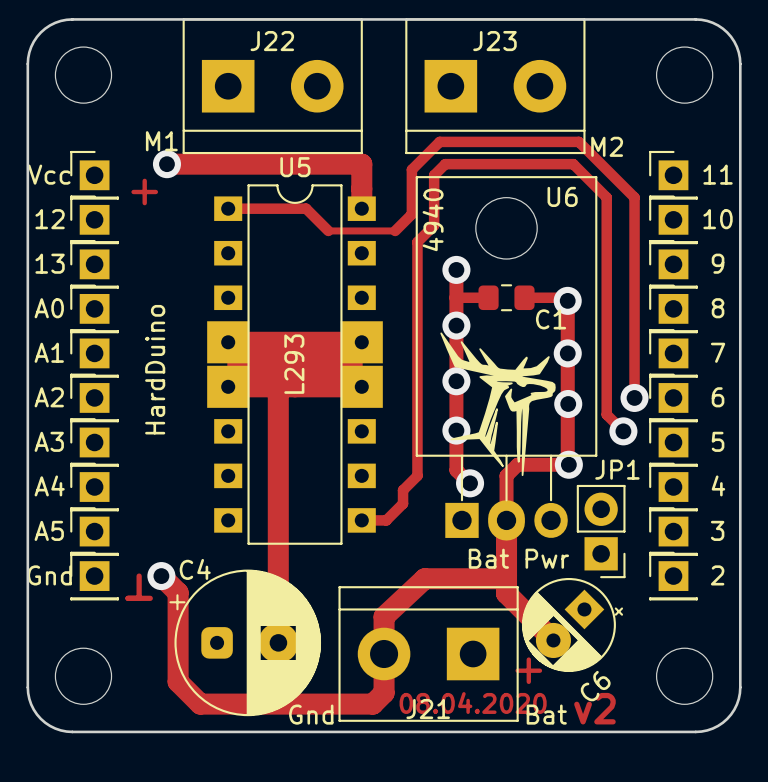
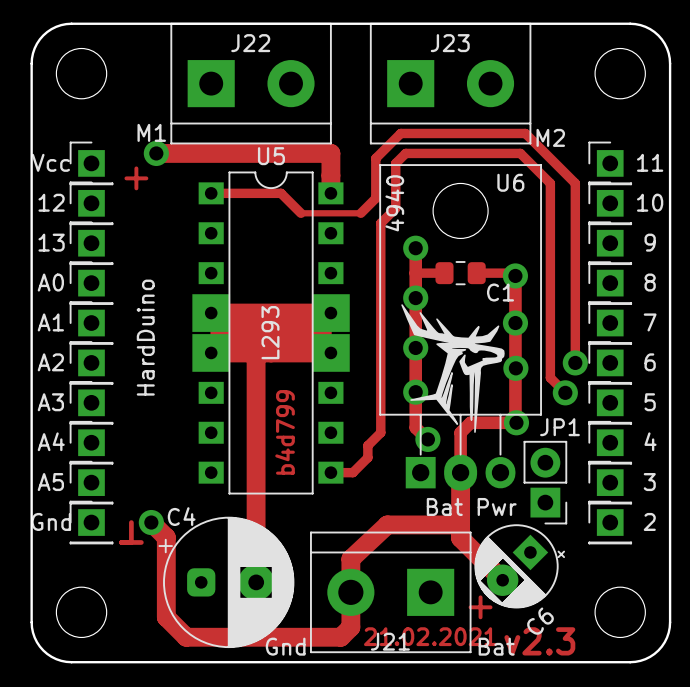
text: none -> b4d799 (285, 432)
text: 08.04.2020 (473, 703) -> 21.02.2021 (430, 636)
text: v2 (594, 708) -> v2.3 (539, 641)

